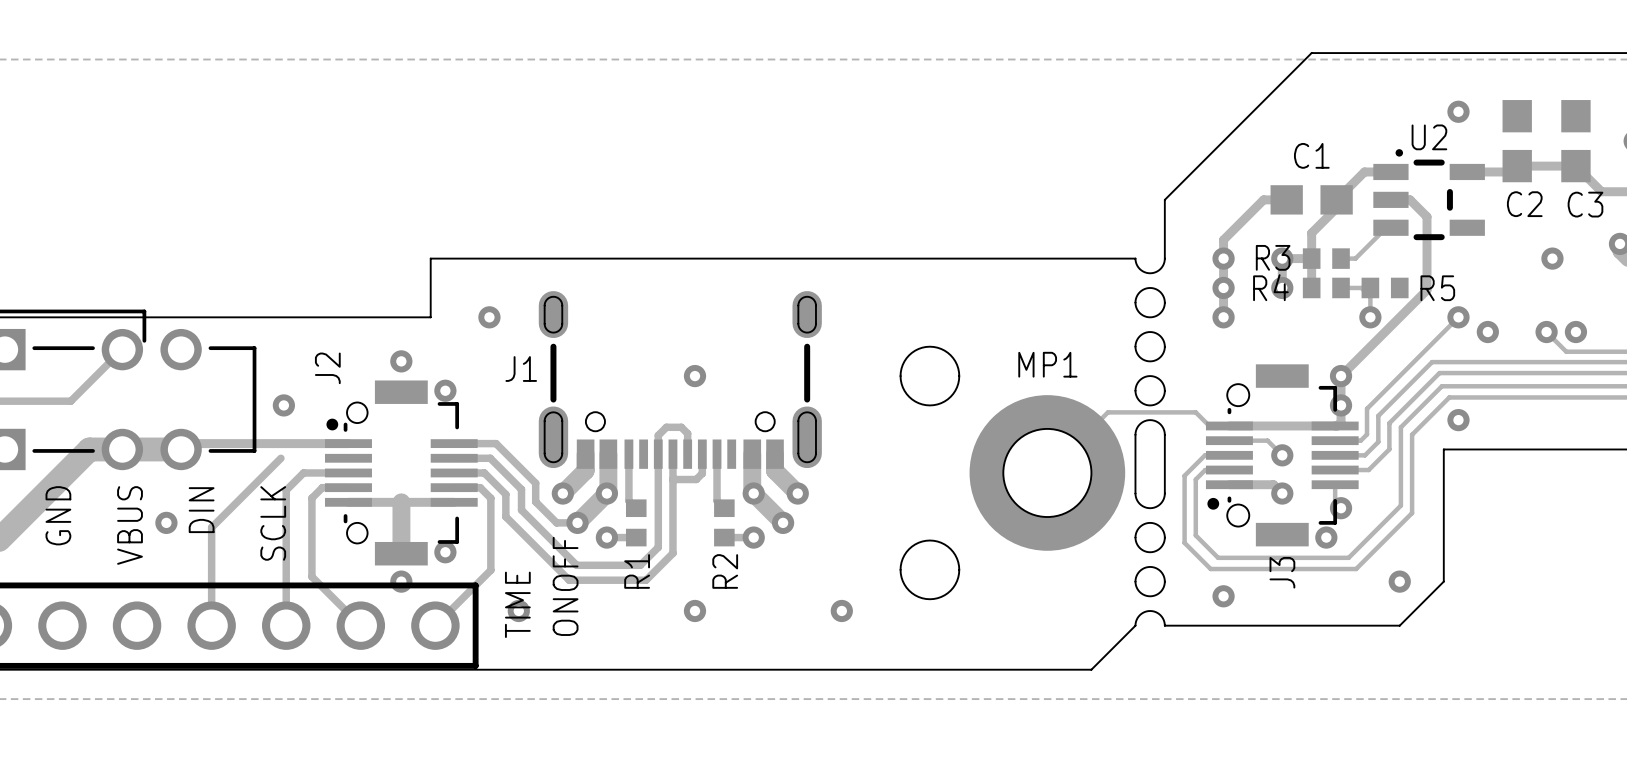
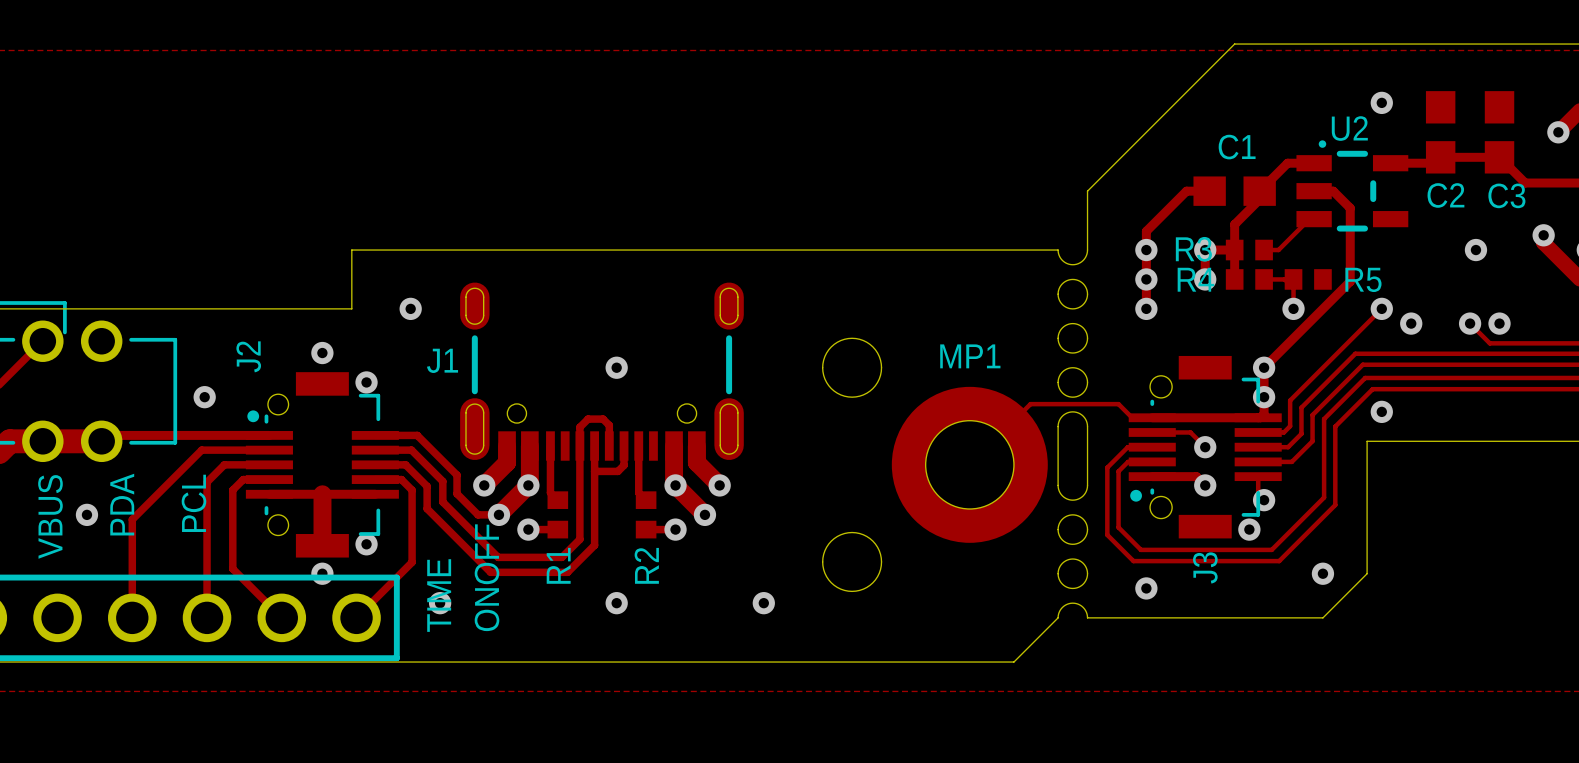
track: none -> (201, 450) (269, 450)
text: DIN (201, 510) -> PDA (122, 504)
text: SCLK (273, 523) -> PCL (193, 503)

